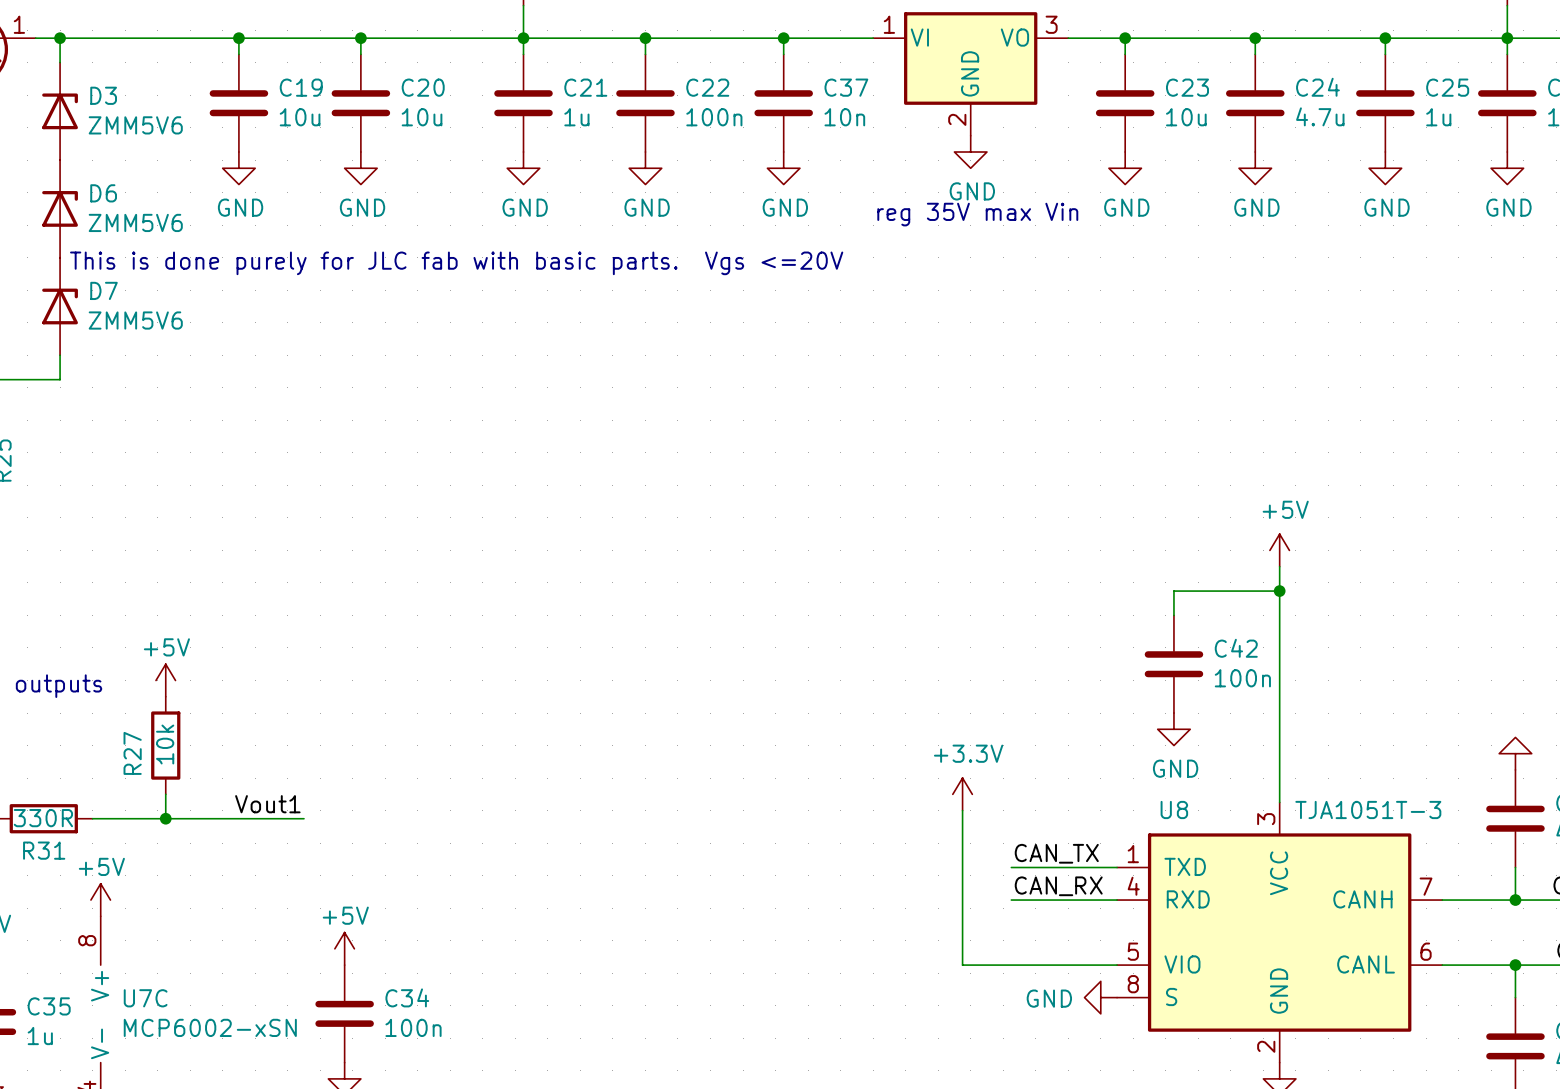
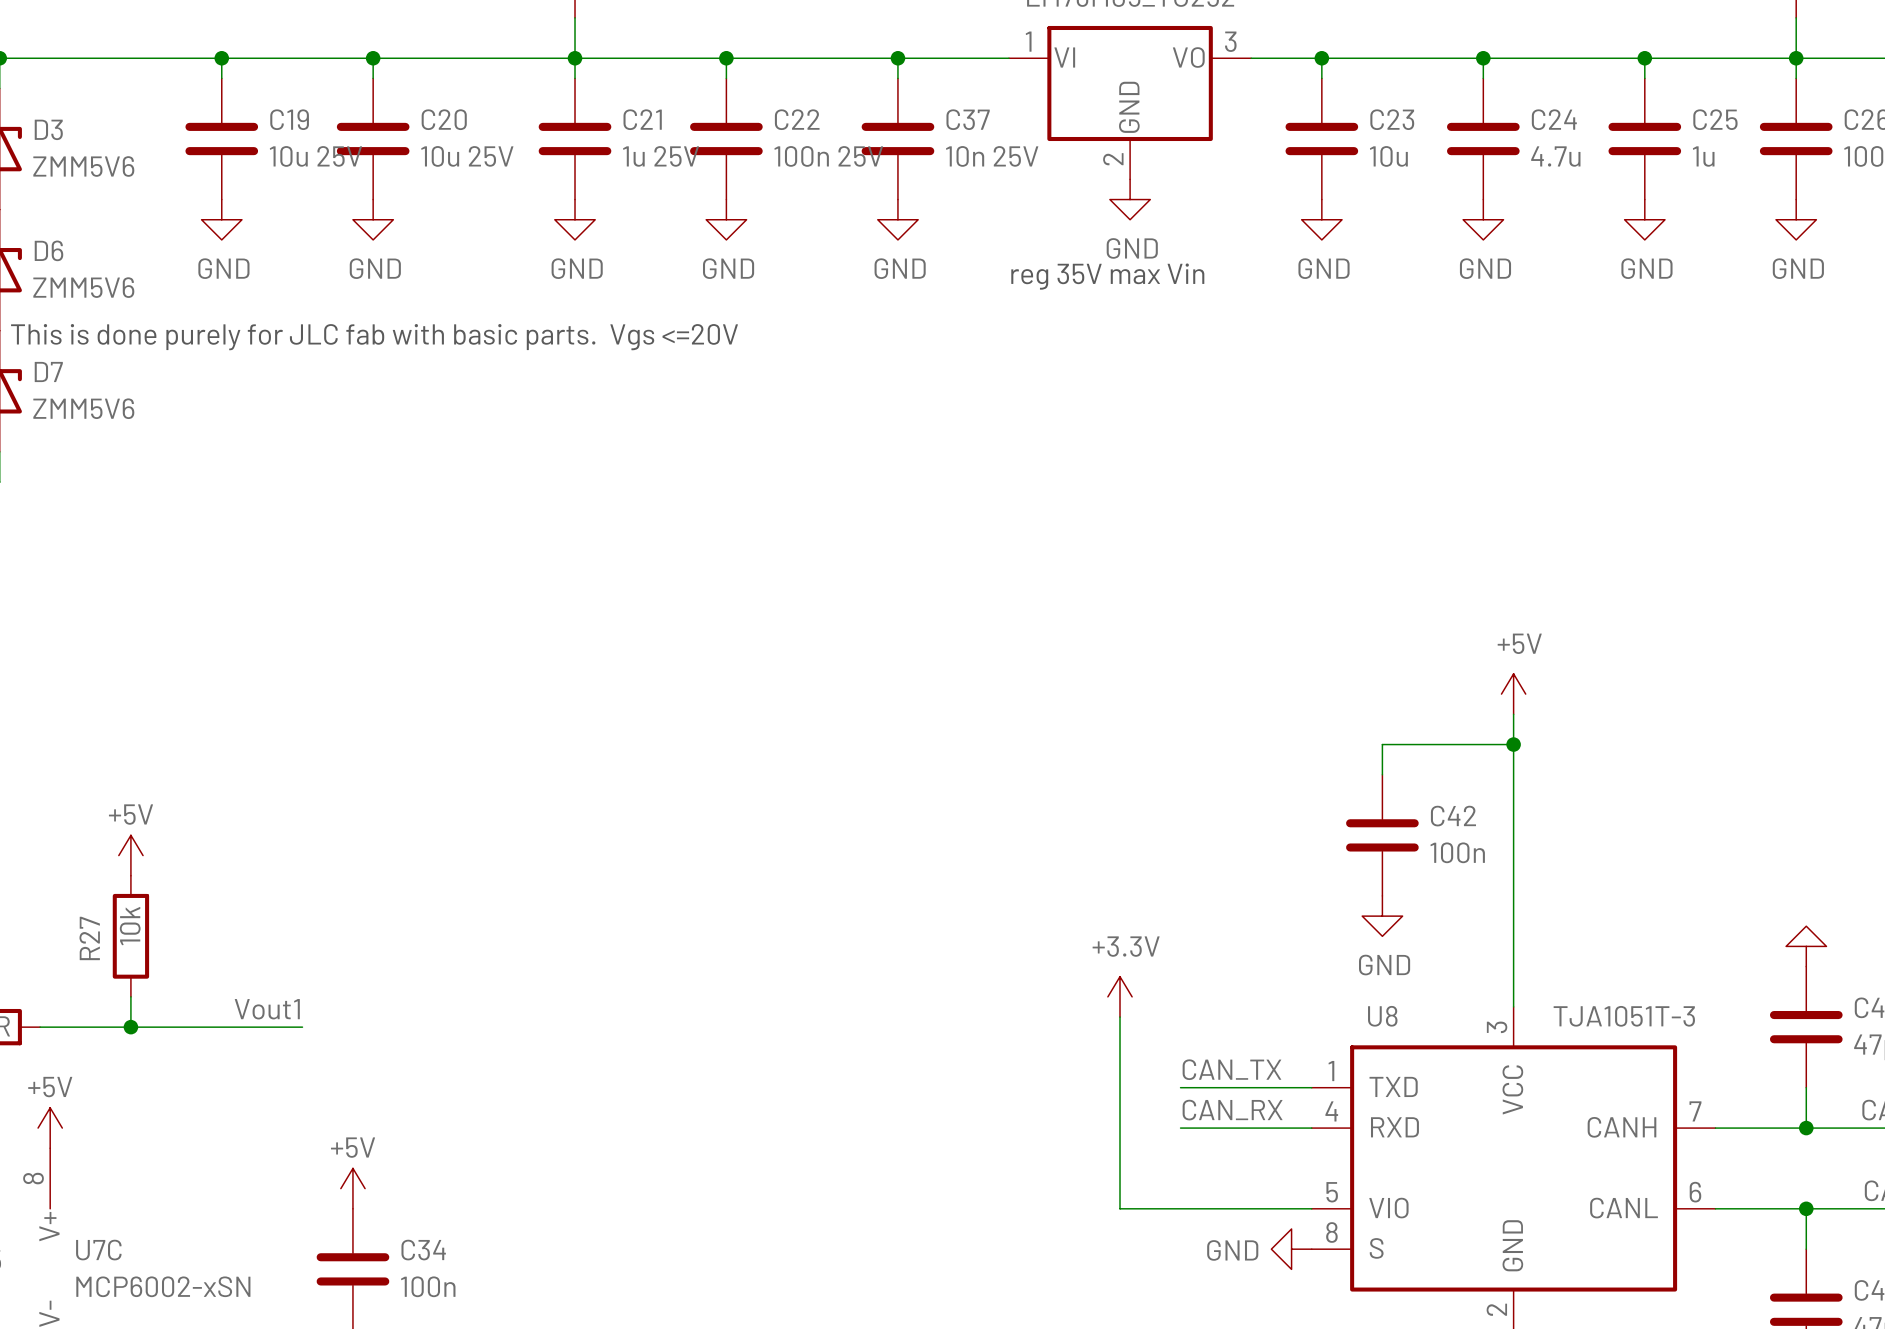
C19 value: 10u (300, 117) -> 10u 25V (315, 156)
C20 value: 10u (422, 117) -> 10u 25V (467, 156)
C21 value: 1u (576, 117) -> 1u 25V (661, 156)
C22 value: 100n (714, 117) -> 100n 25V (828, 156)
C37 value: 10n (844, 117) -> 10n 25V (992, 156)

